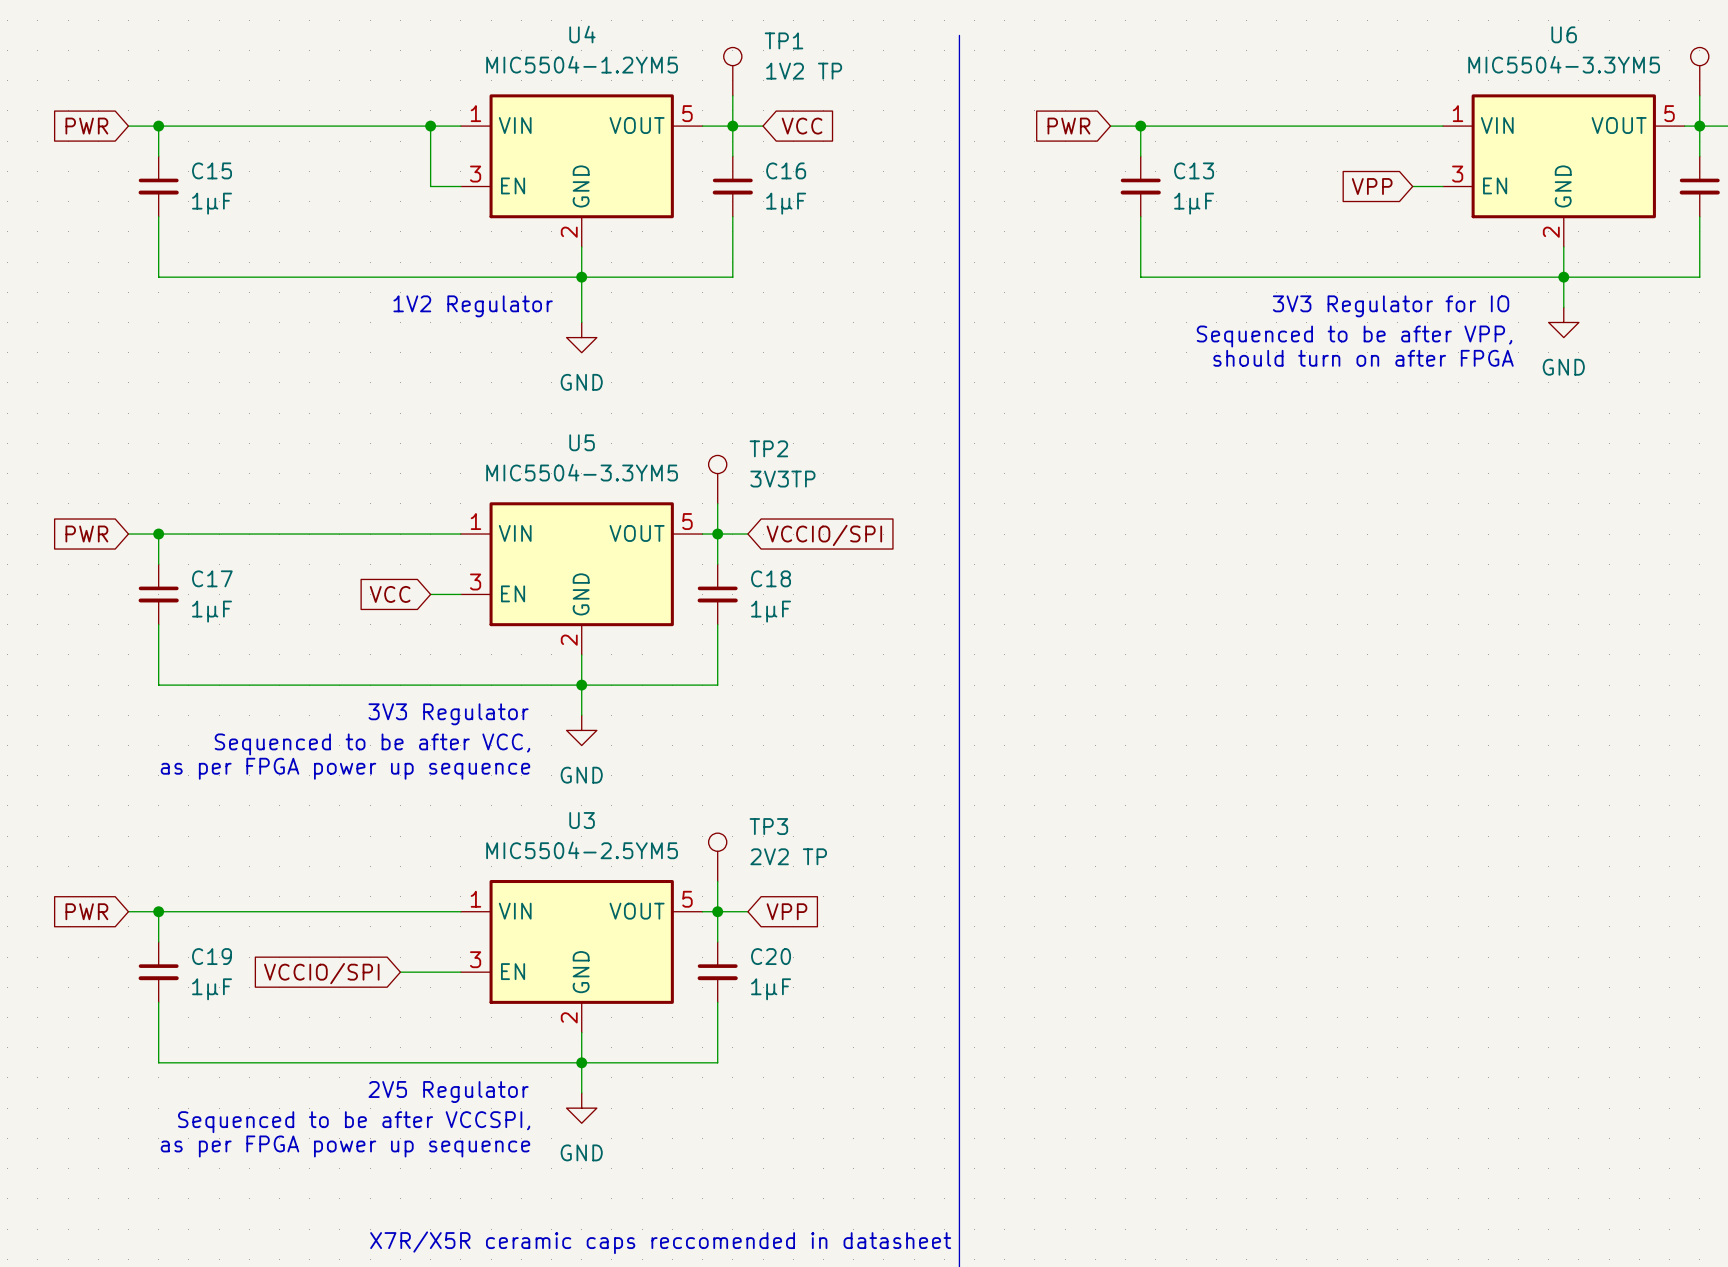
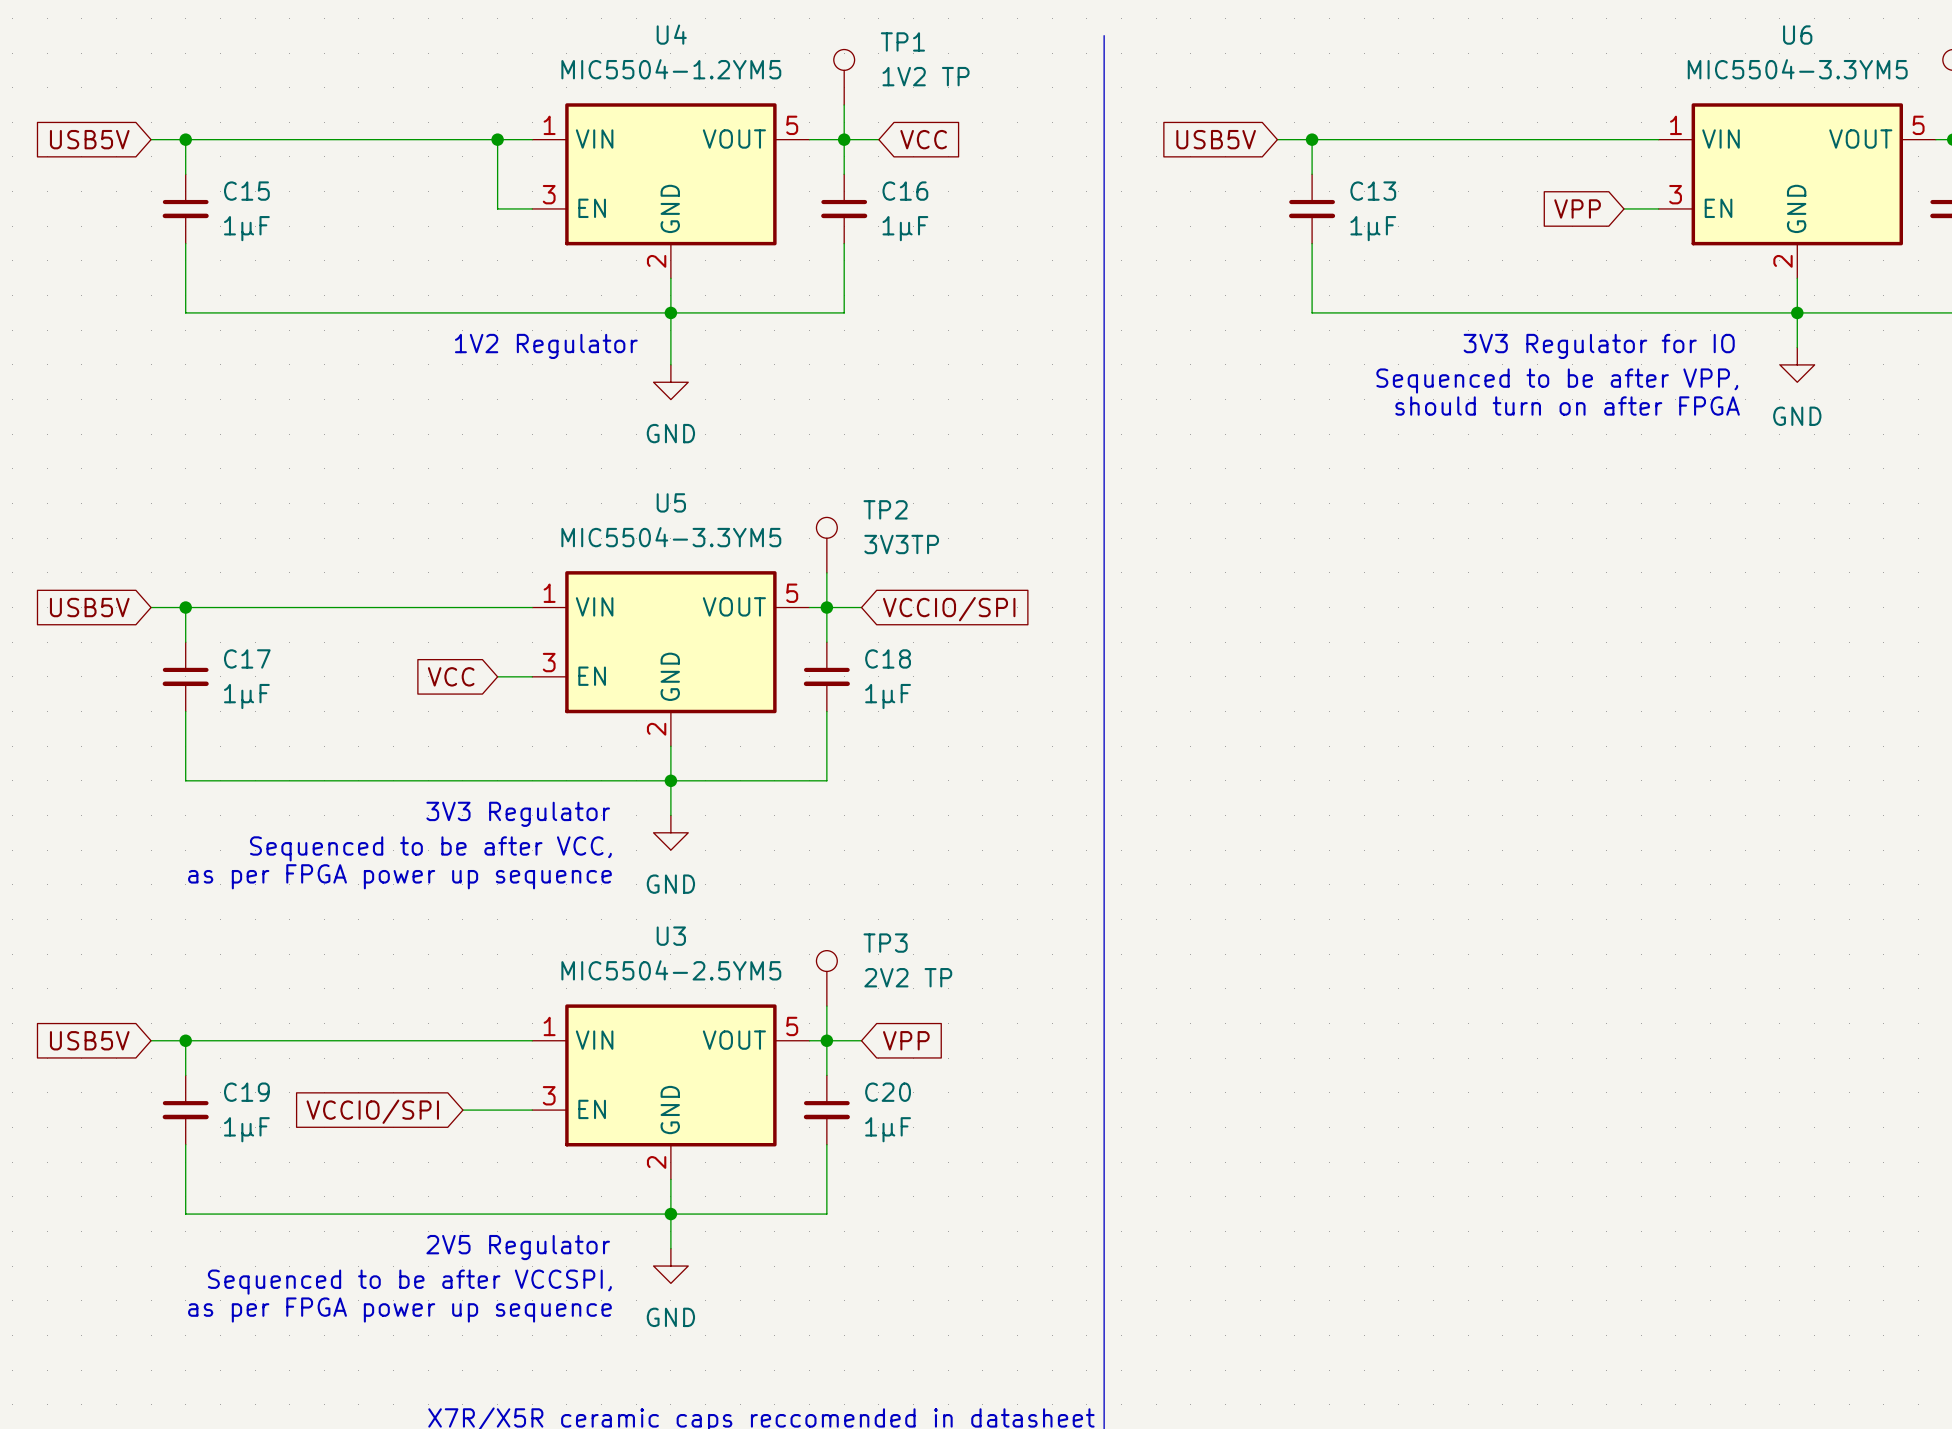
global label: PWR (86, 126) -> USB5V (89, 139)
global label: PWR (1068, 126) -> USB5V (1216, 139)
global label: PWR (86, 534) -> USB5V (89, 607)
global label: PWR (86, 911) -> USB5V (89, 1040)

